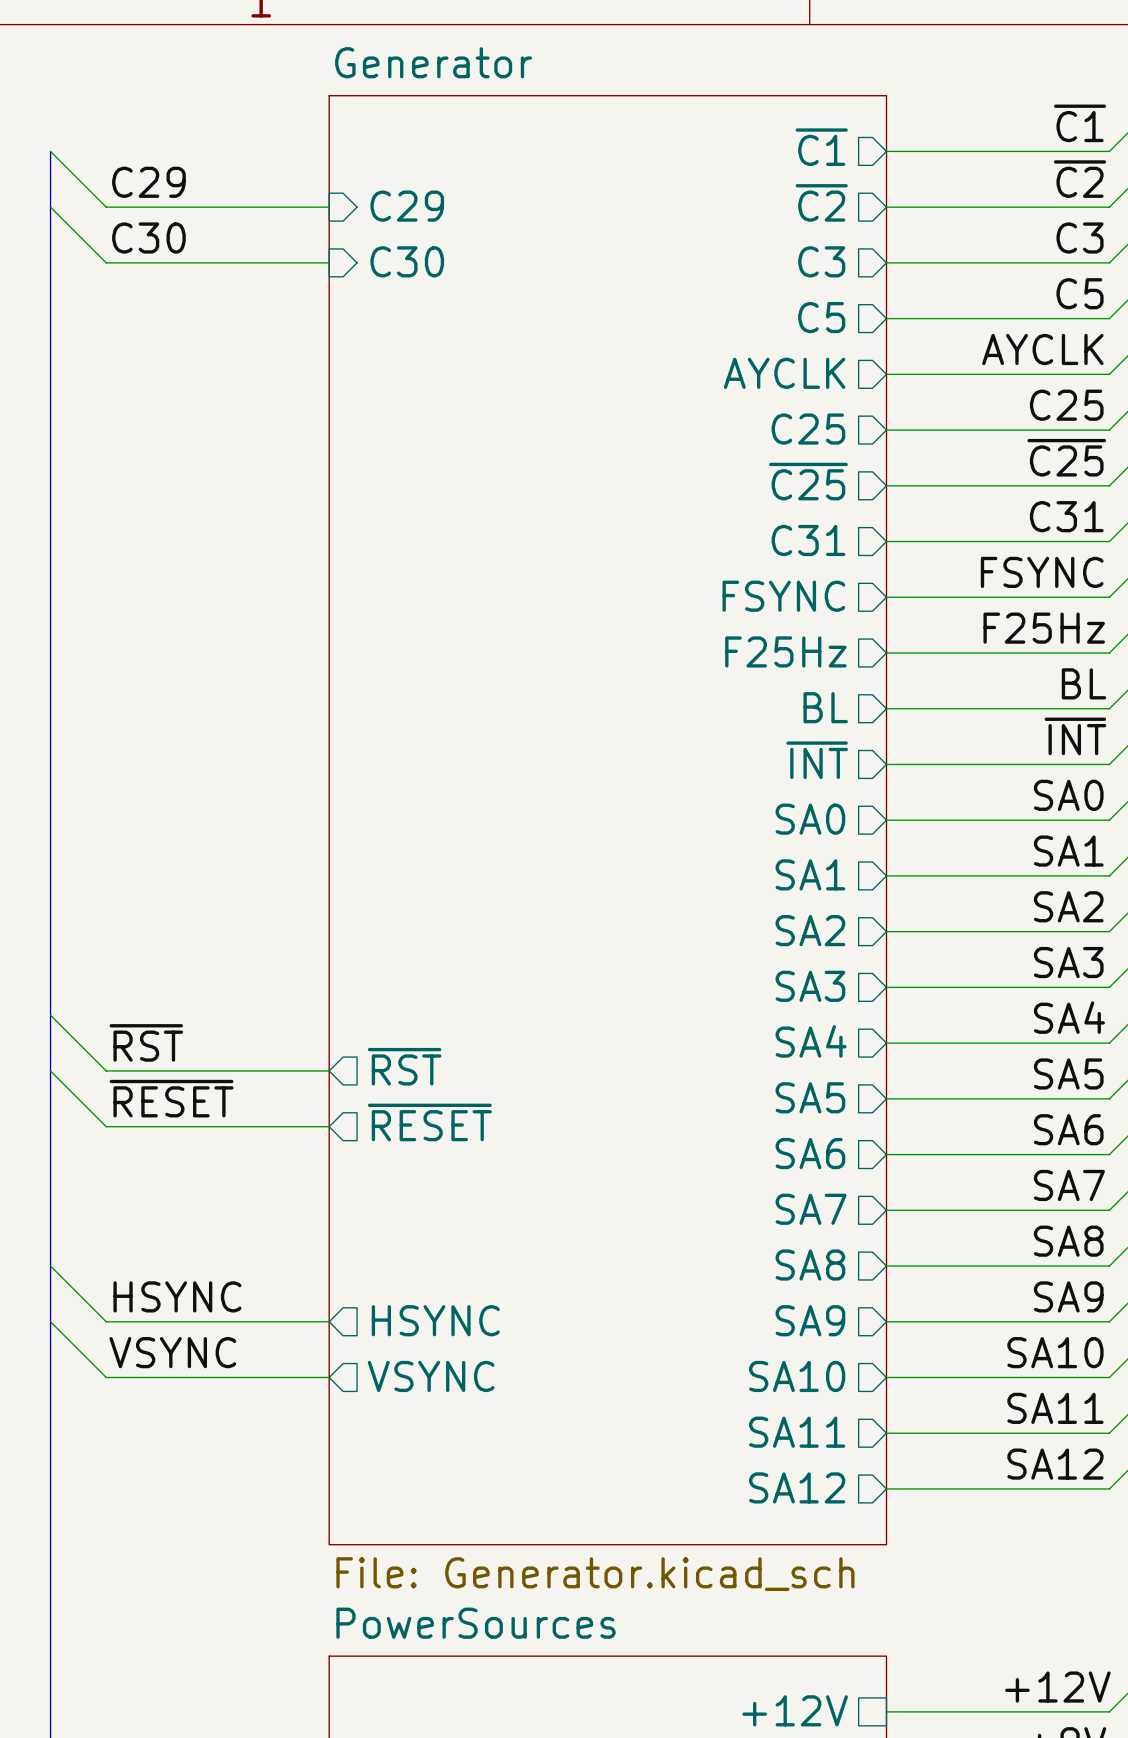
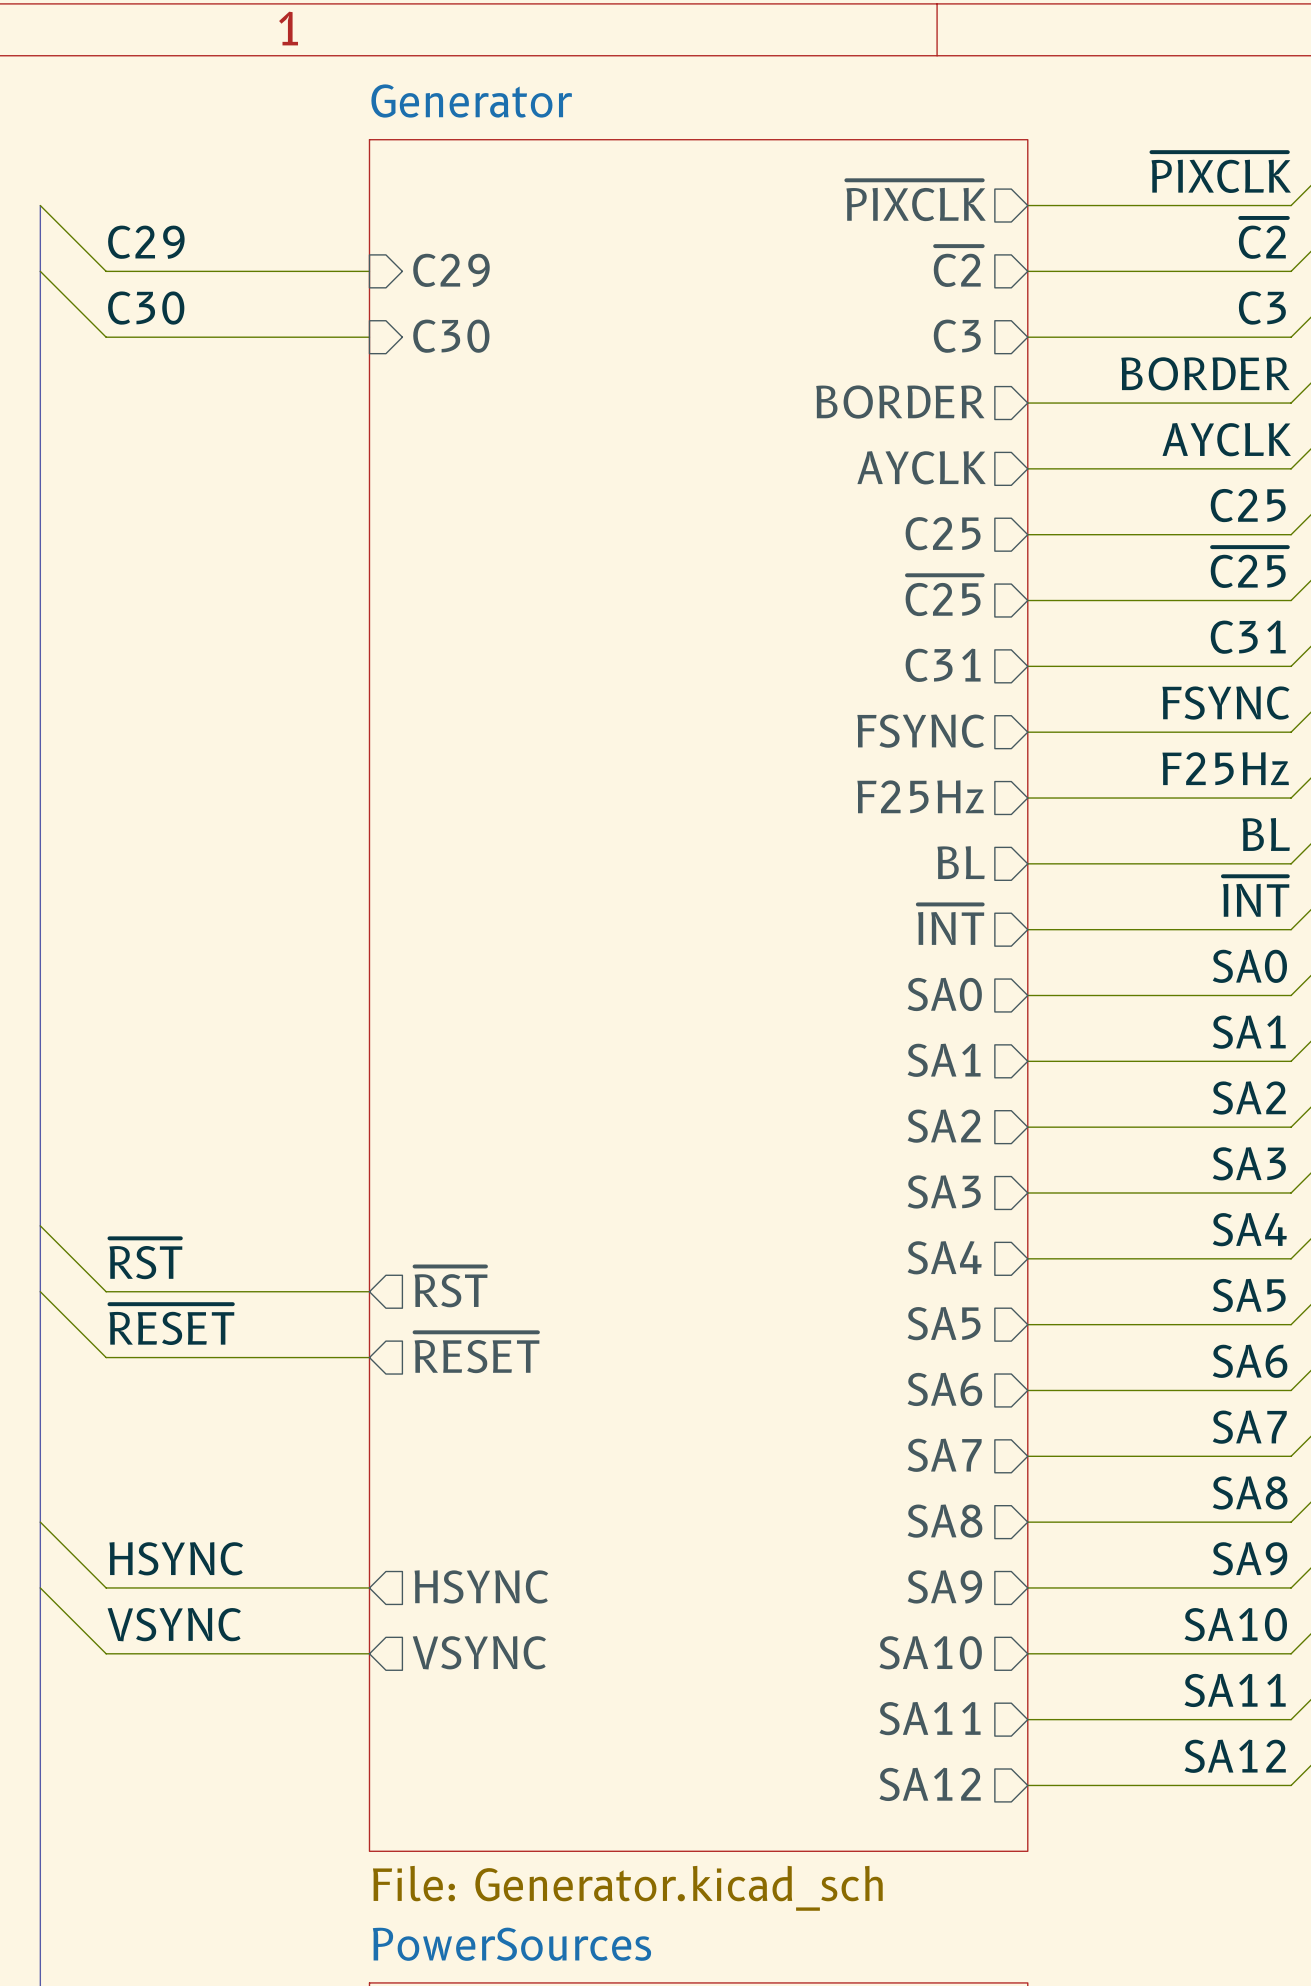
label: ~{C1} (1080, 123) -> ~{PIXCLK} (1221, 172)
sheet pin: ~{C1} (821, 147) -> ~{PIXCLK} (916, 200)
label: C5 (1080, 293) -> BORDER (1205, 373)
sheet pin: C5 (821, 317) -> BORDER (900, 402)

